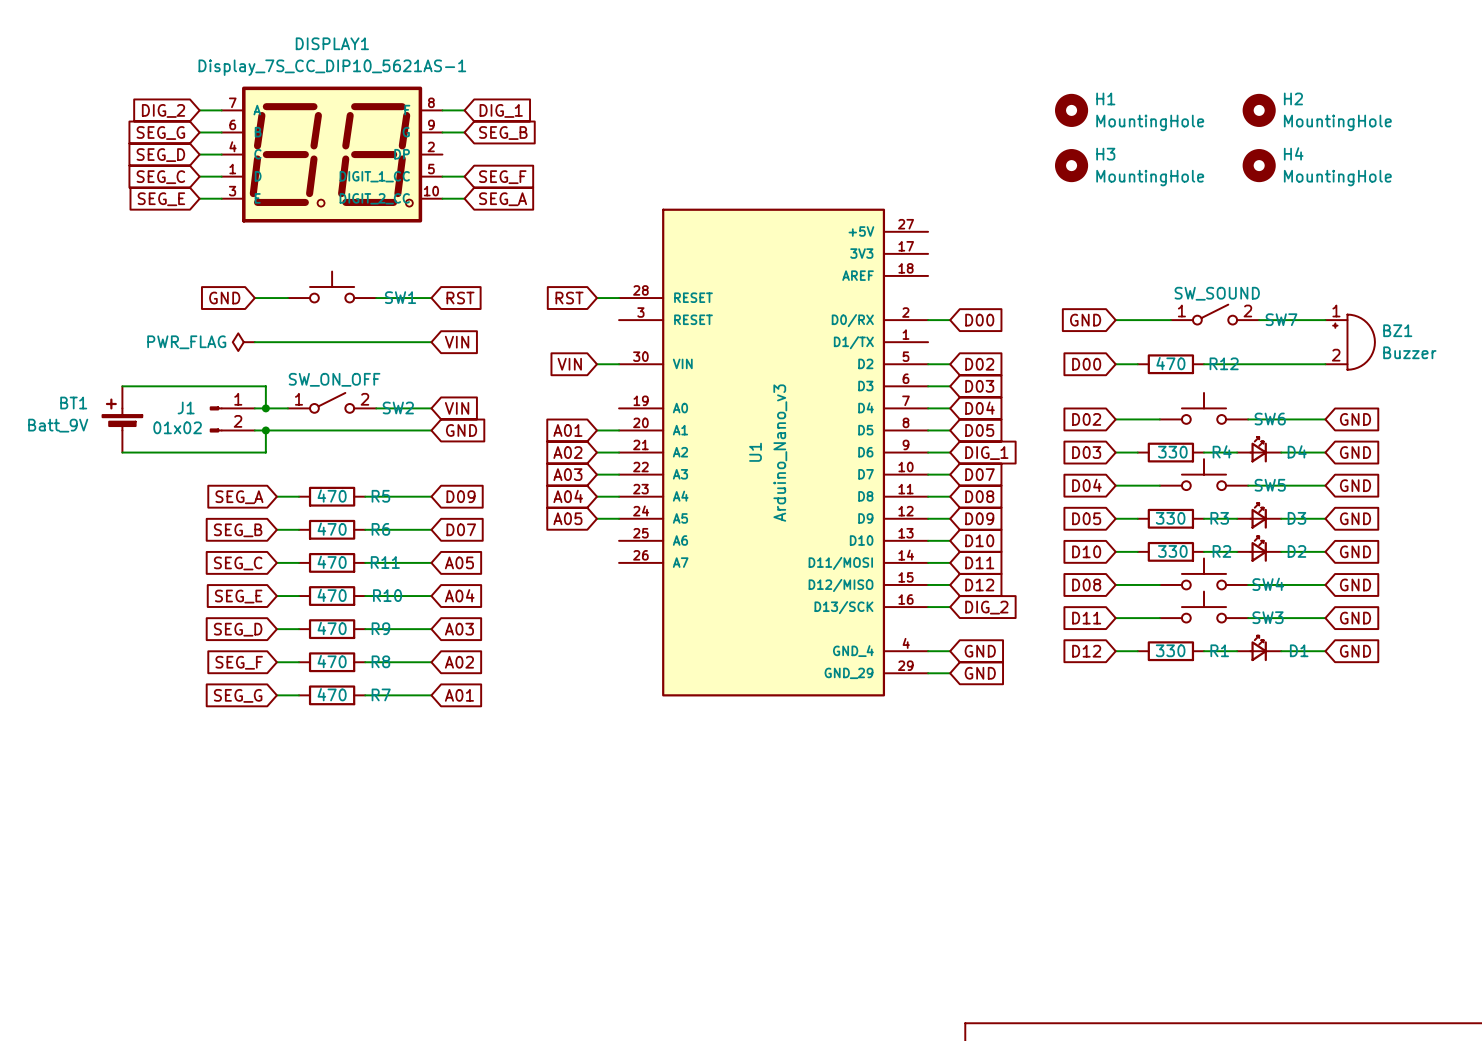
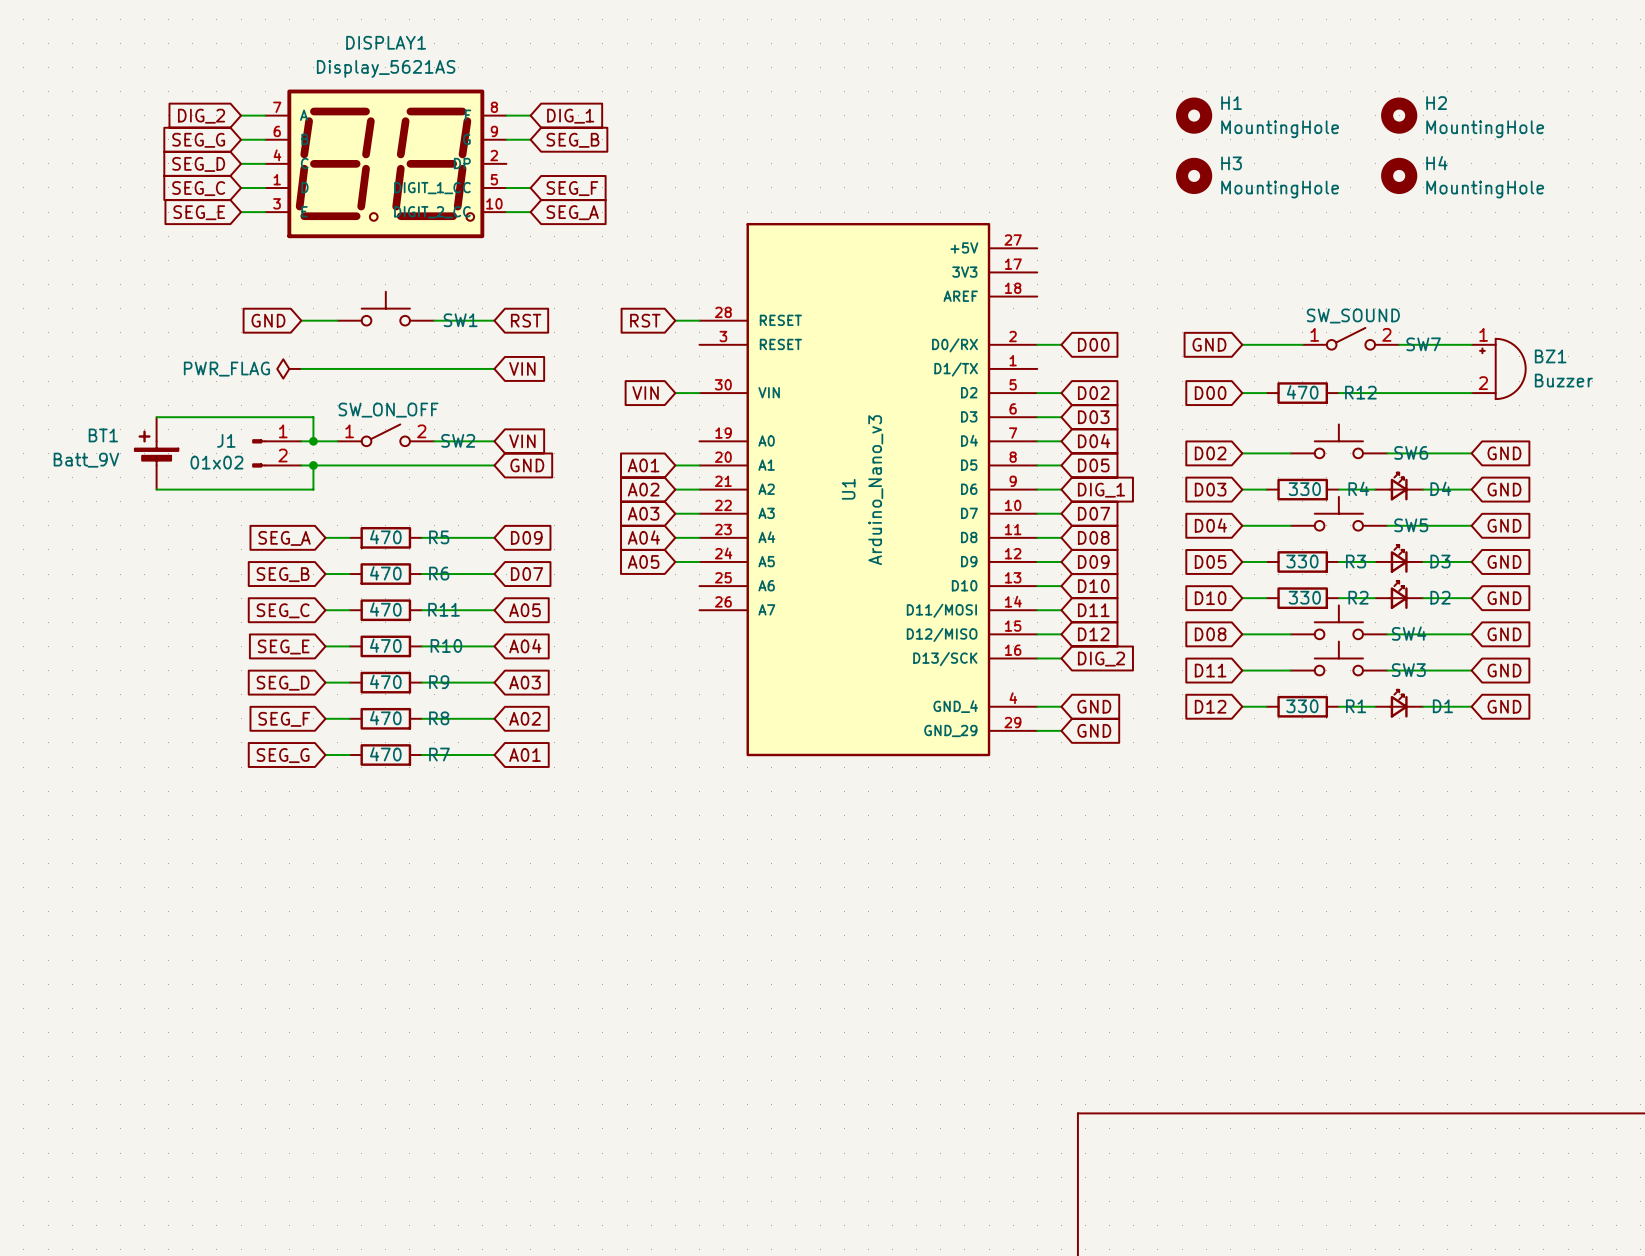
DISPLAY1 value: Display_7S_CC_DIP10_5621AS-1 (332, 67) -> Display_5621AS (386, 68)

